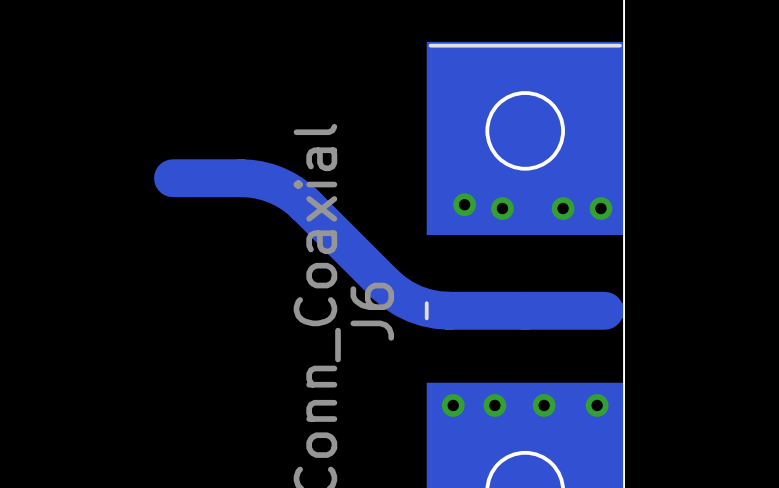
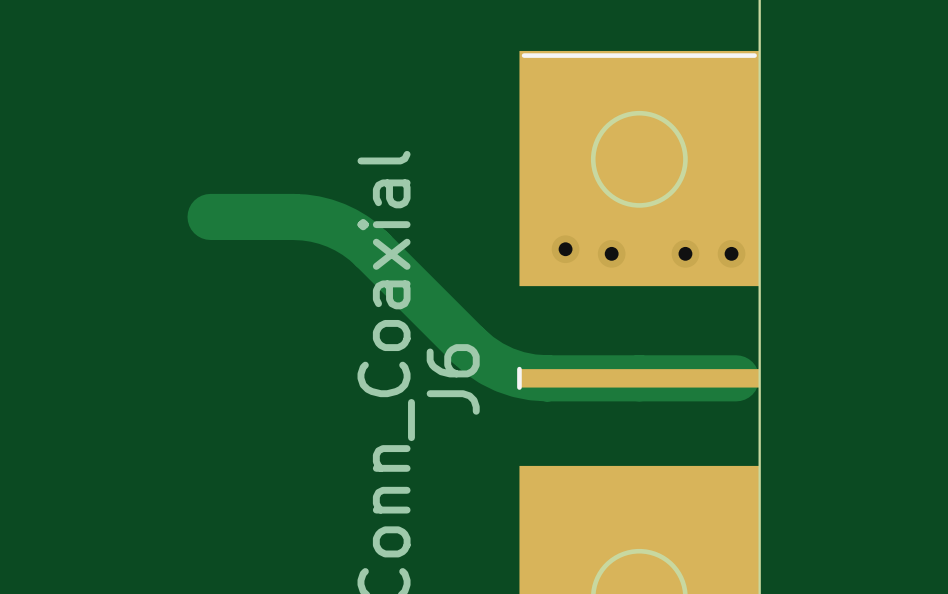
via: (453, 405) -> none
via: (494, 405) -> none
via: (544, 405) -> none
via: (597, 405) -> none

